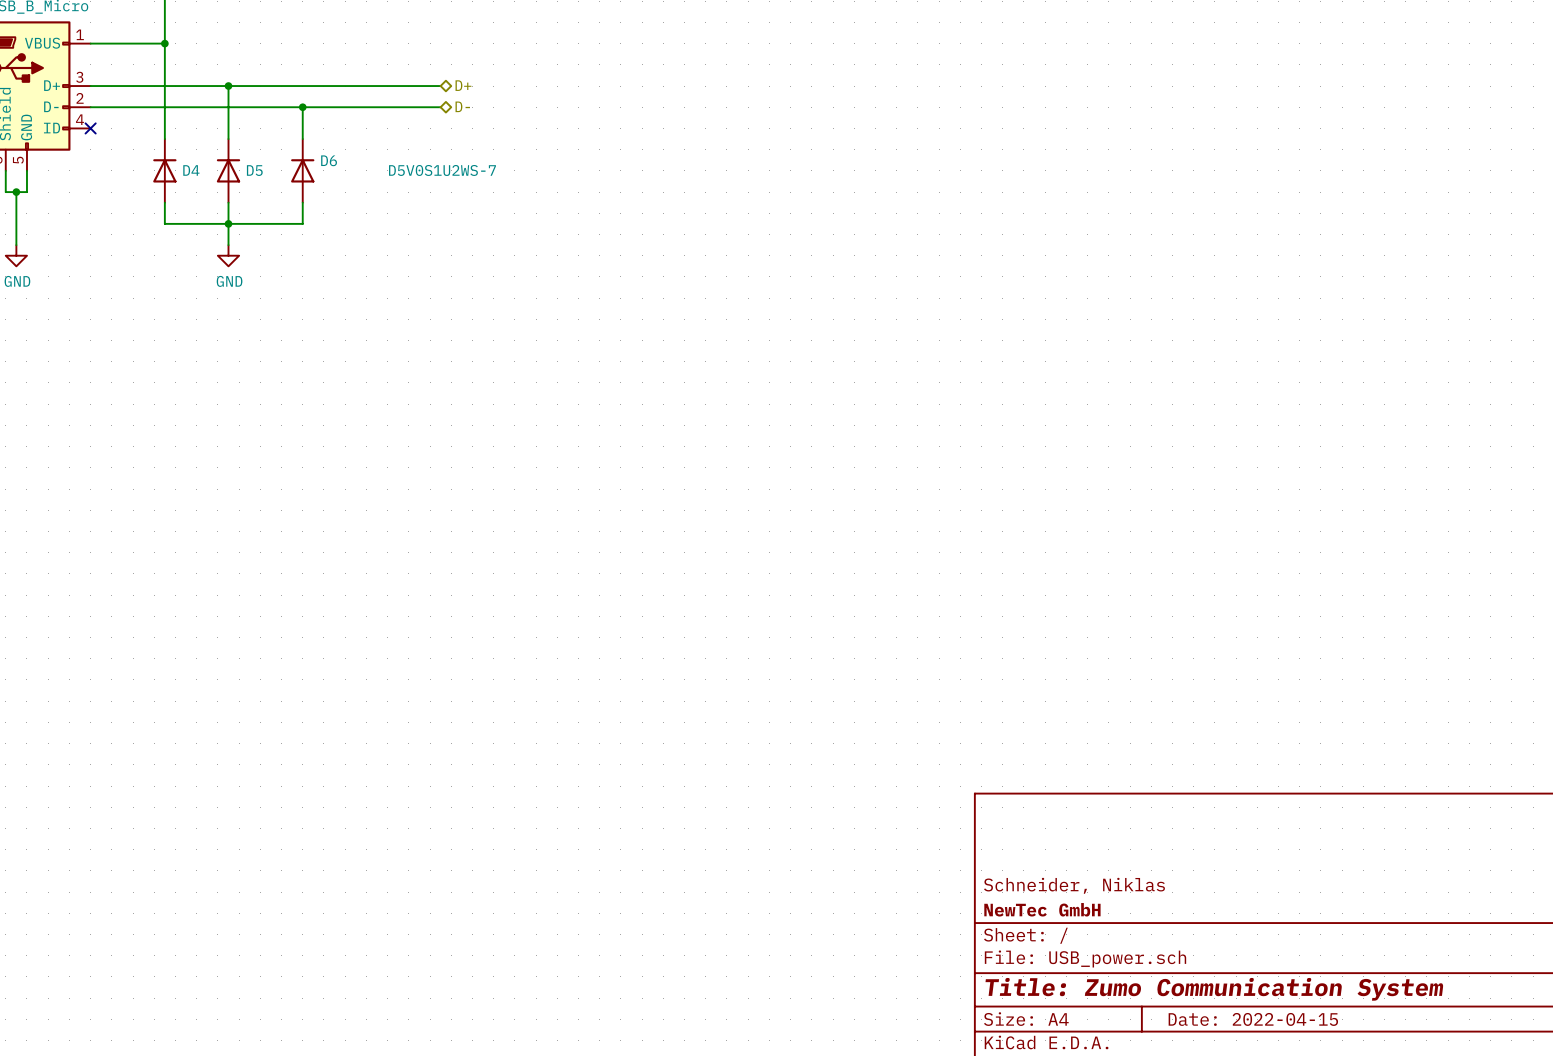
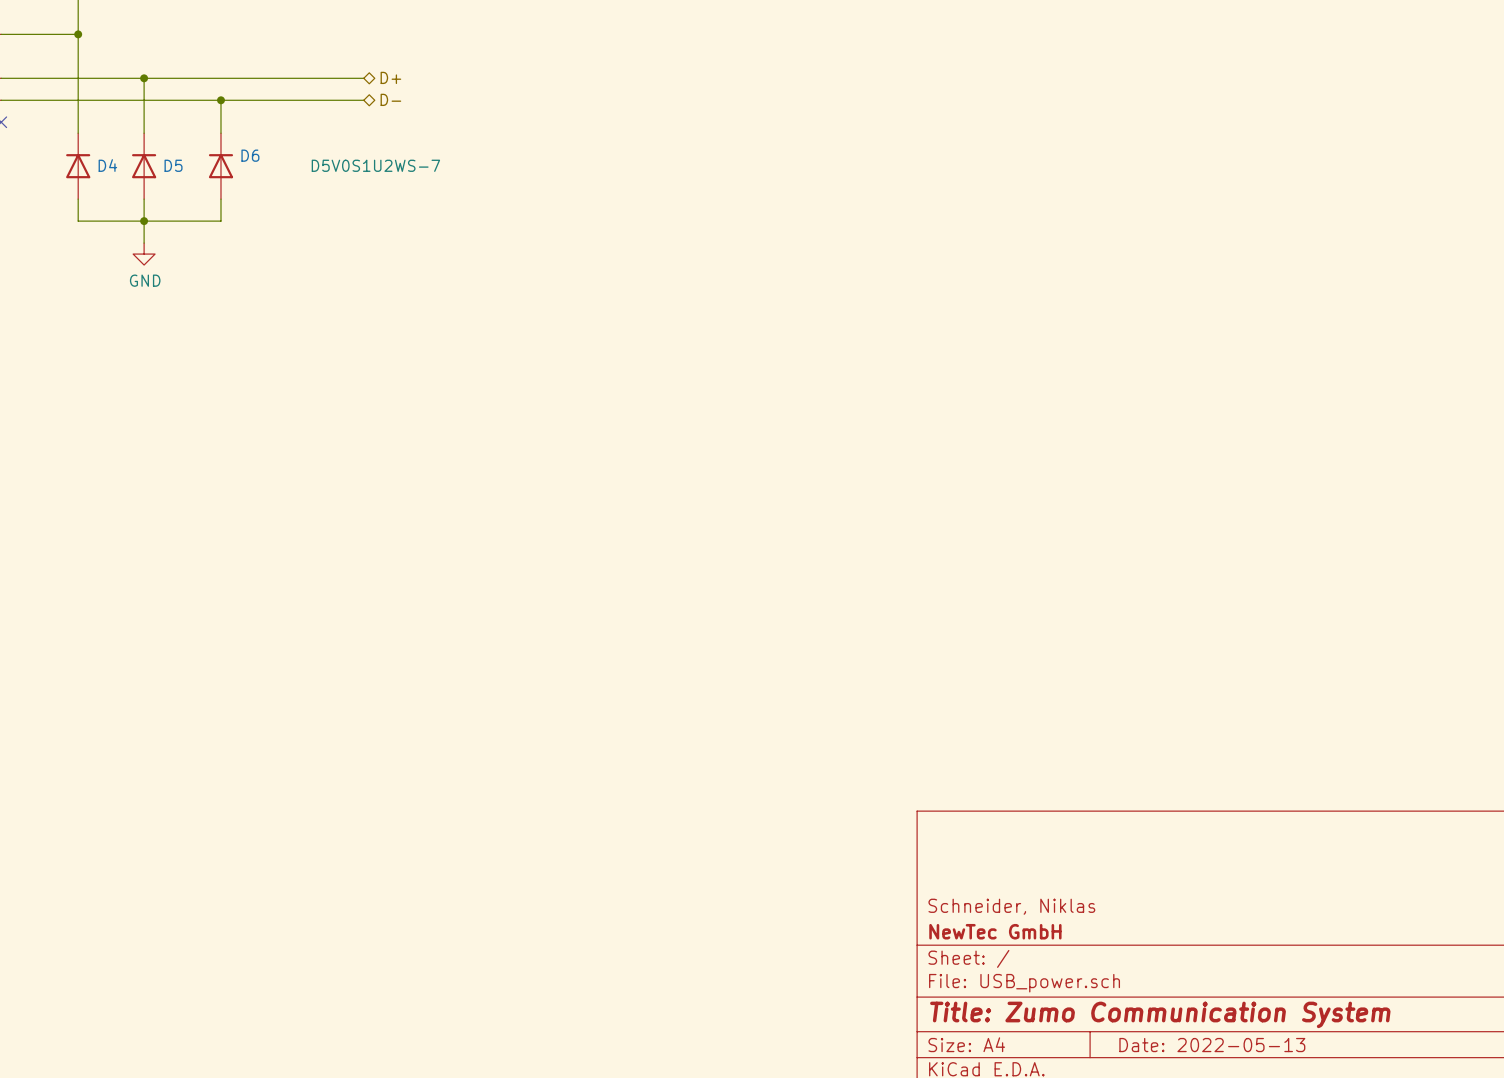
title block: Date: 2022-04-15 (1253, 1019) -> Date: 2022-05-13 (1212, 1045)

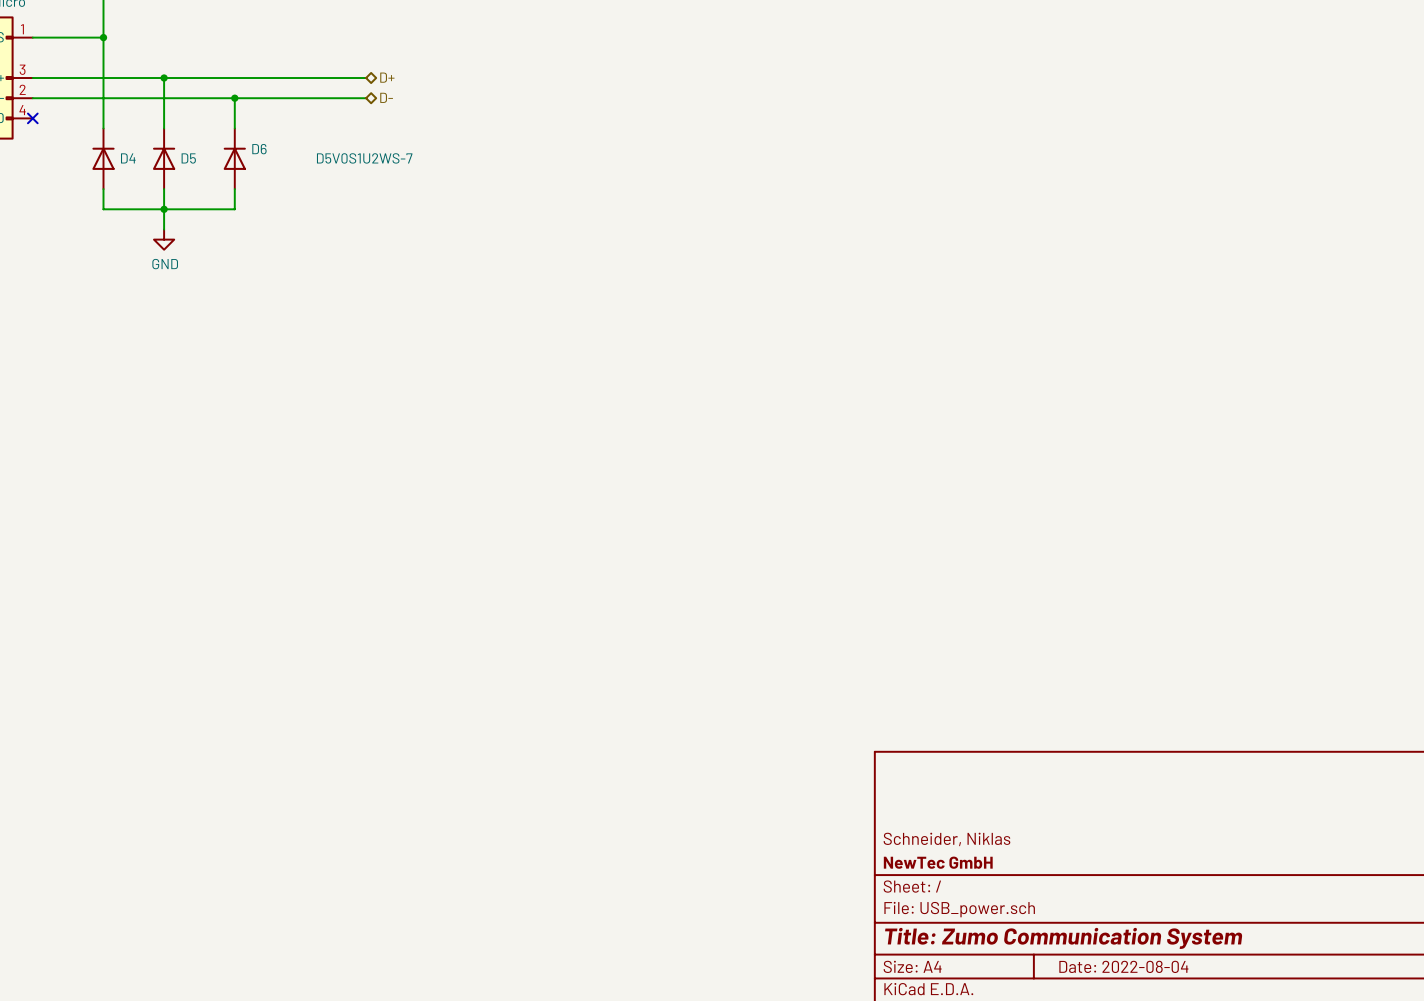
title block: Date: 2022-05-13 (1212, 1045) -> Date: 2022-08-04 (1123, 966)

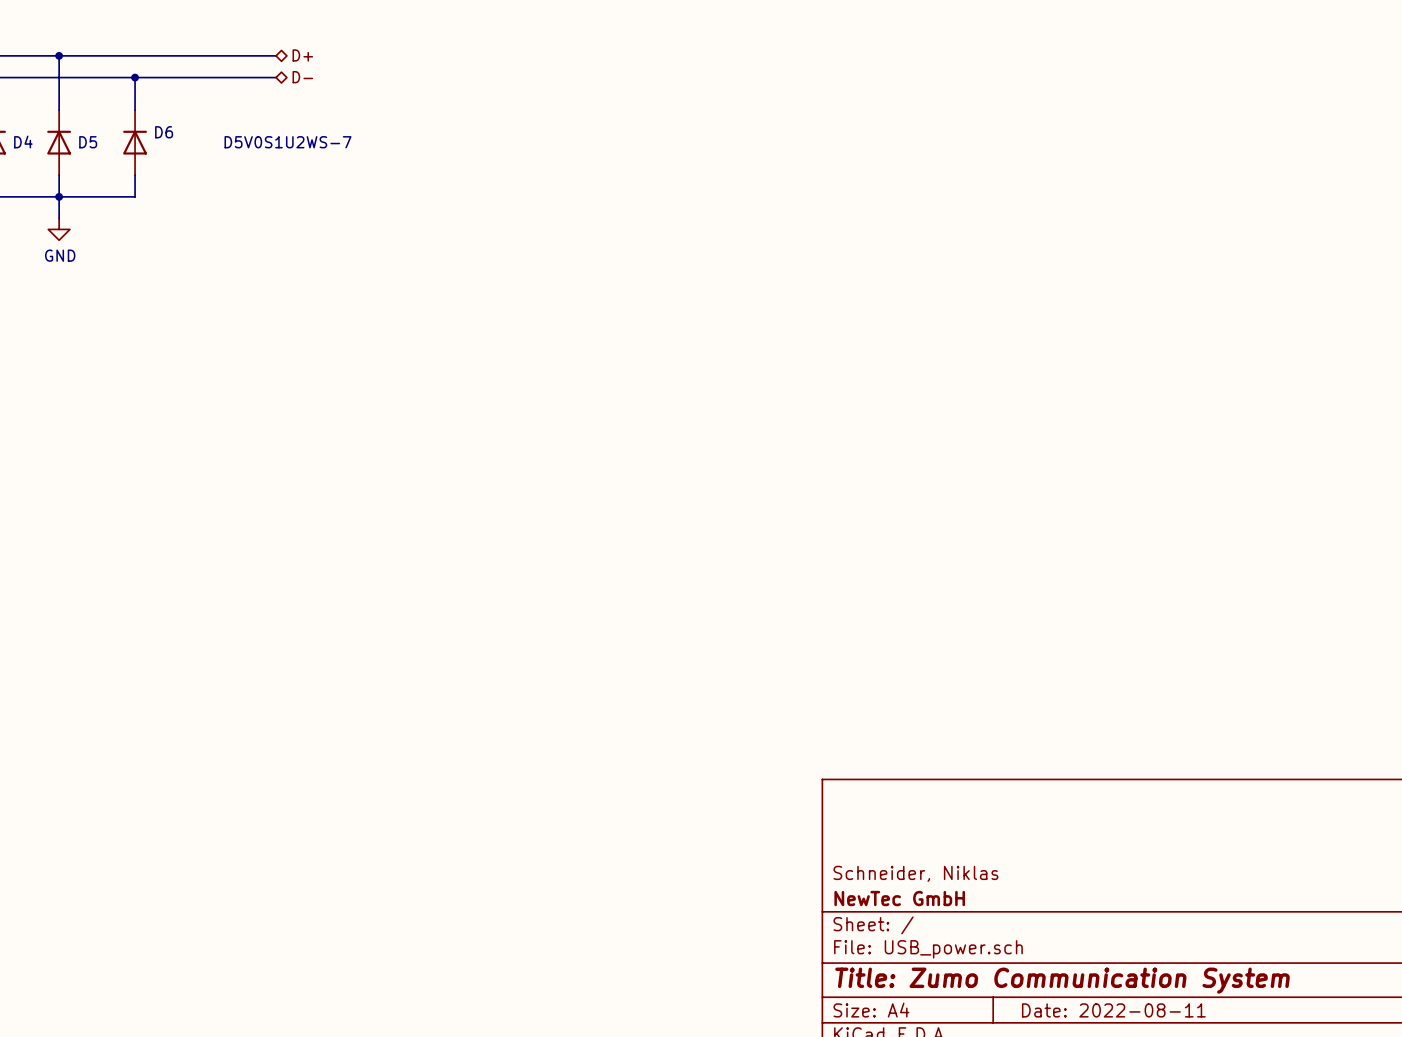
title block: Date: 2022-08-04 (1123, 966) -> Date: 2022-08-11 (1113, 1010)

